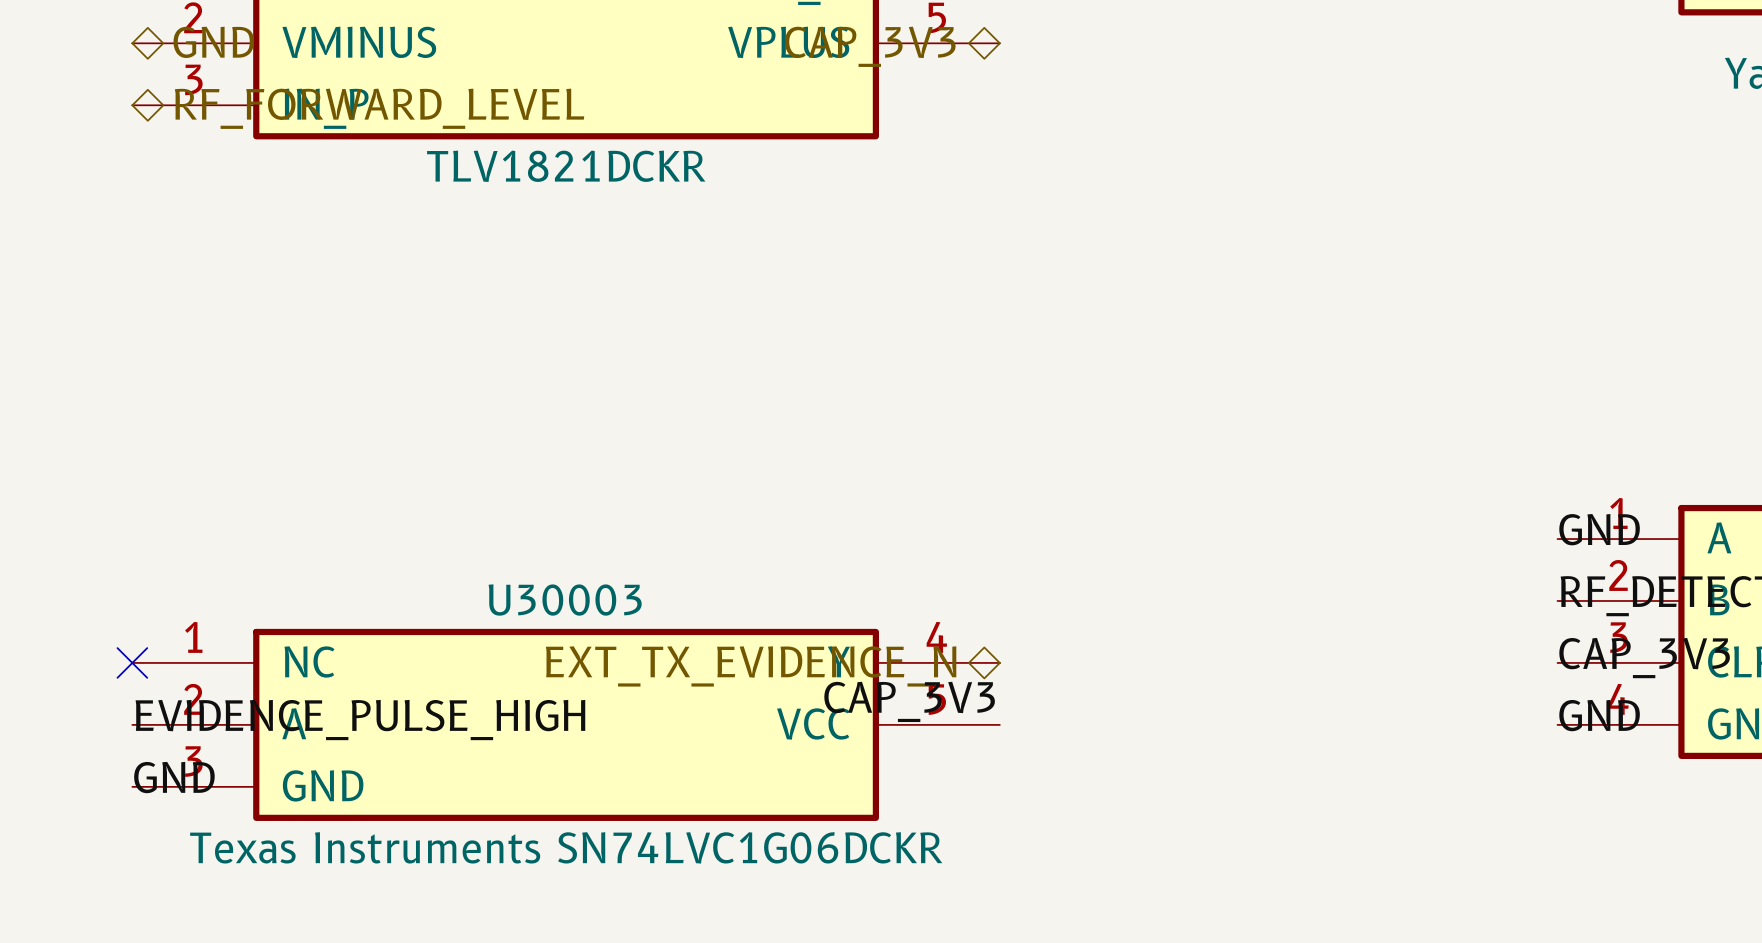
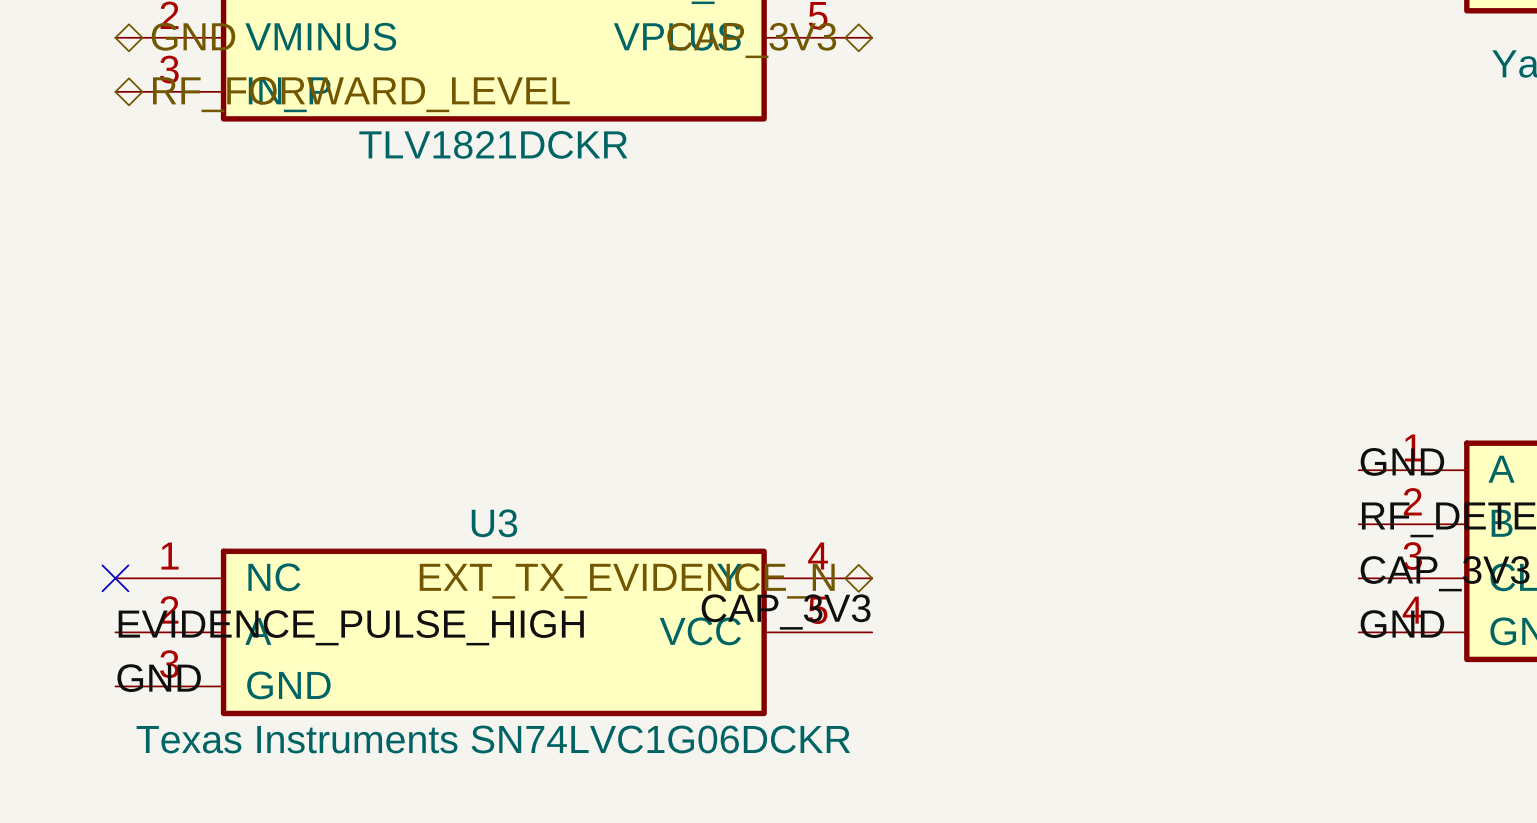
U30003 name: U30003 (565, 600) -> U3 (494, 523)

